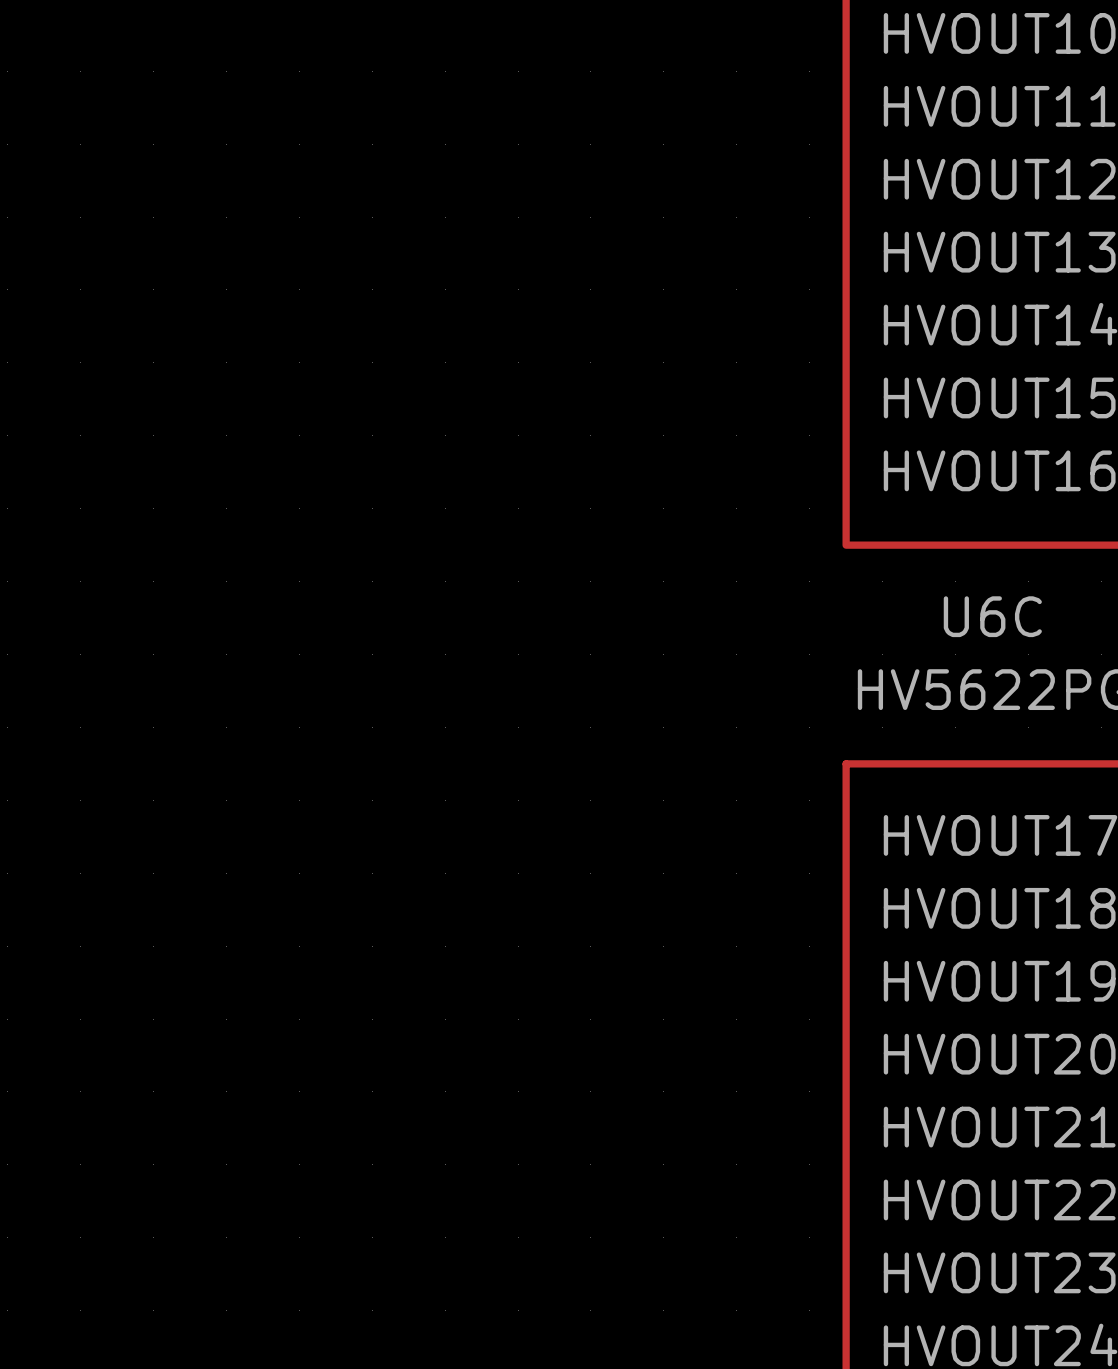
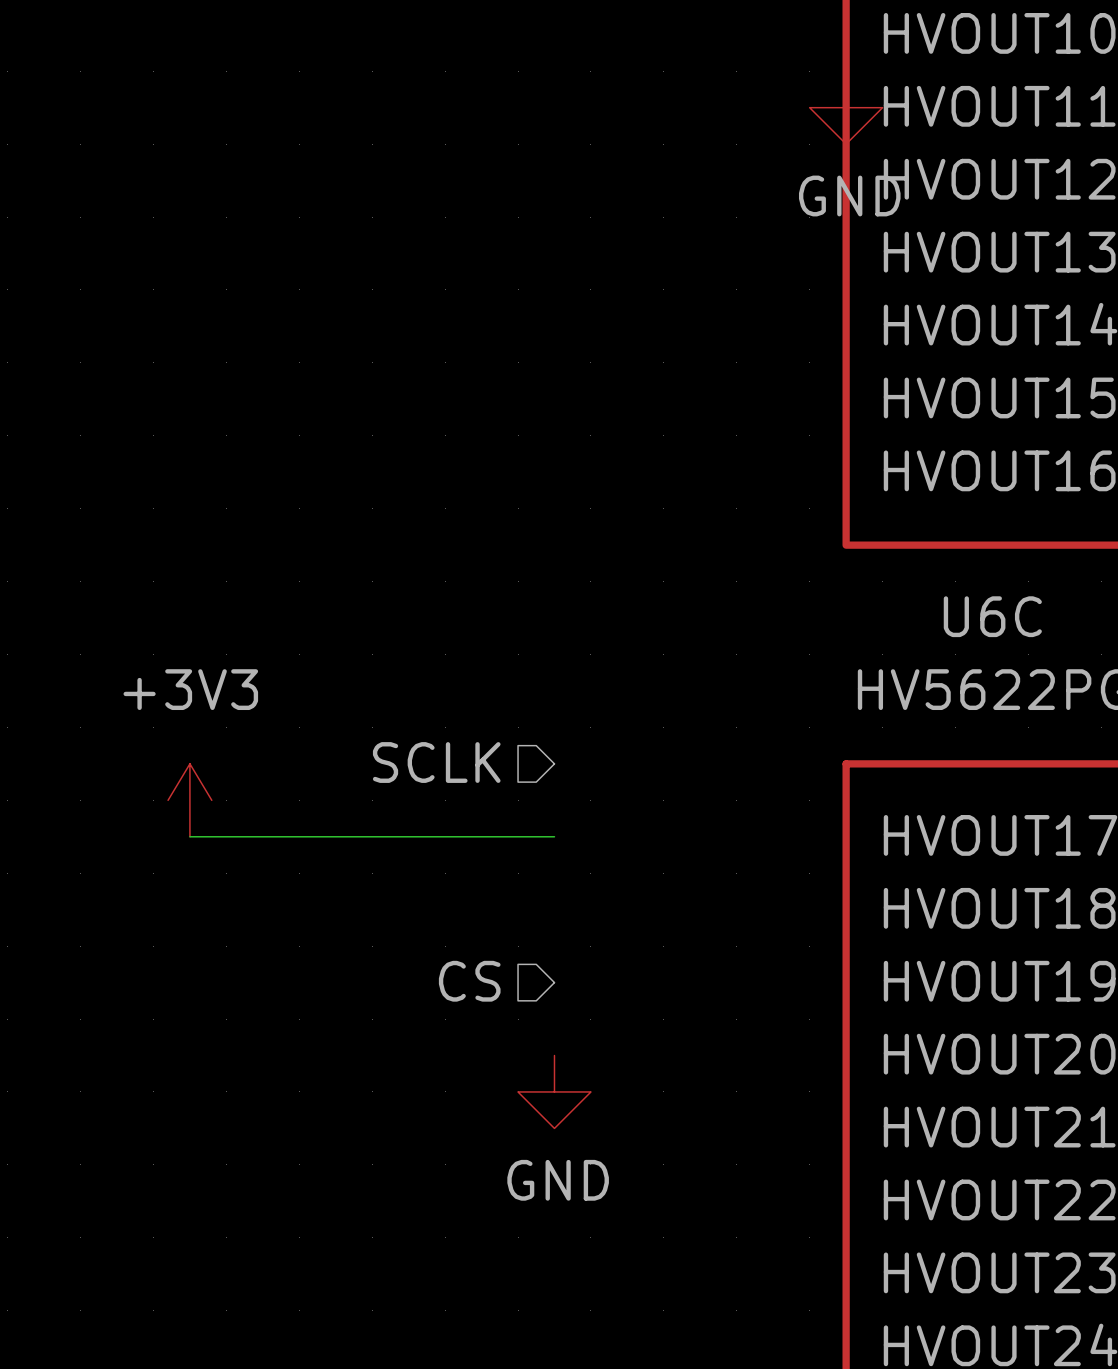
power symbol: none -> GND (846, 107)
hierarchical label: none -> SCLK (436, 762)
power symbol: none -> +3V3 (189, 800)
wire: none -> (189, 836) (554, 836)
hierarchical label: none -> CS (469, 981)
power symbol: none -> GND (554, 1091)

